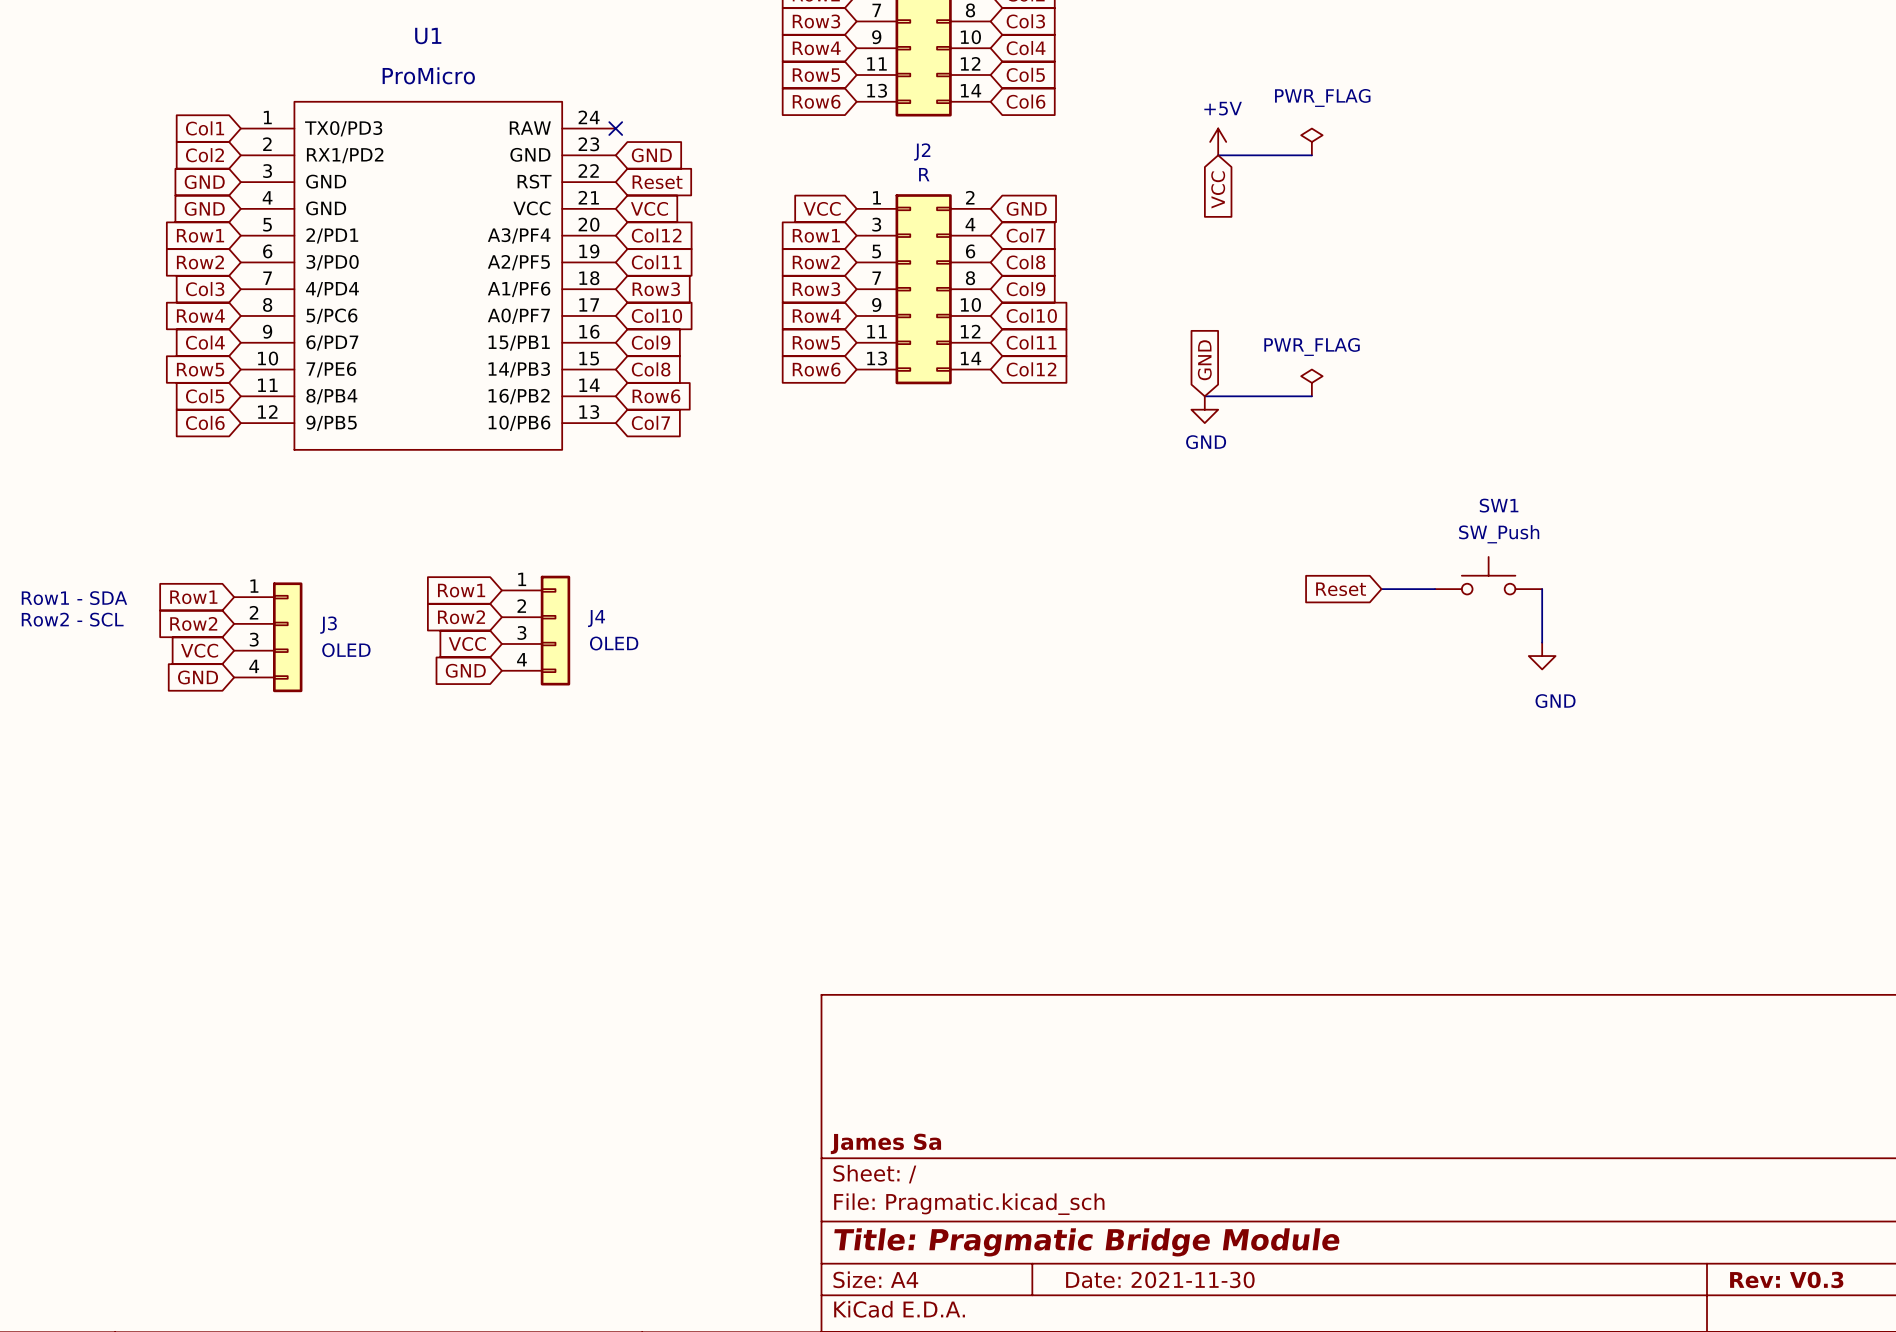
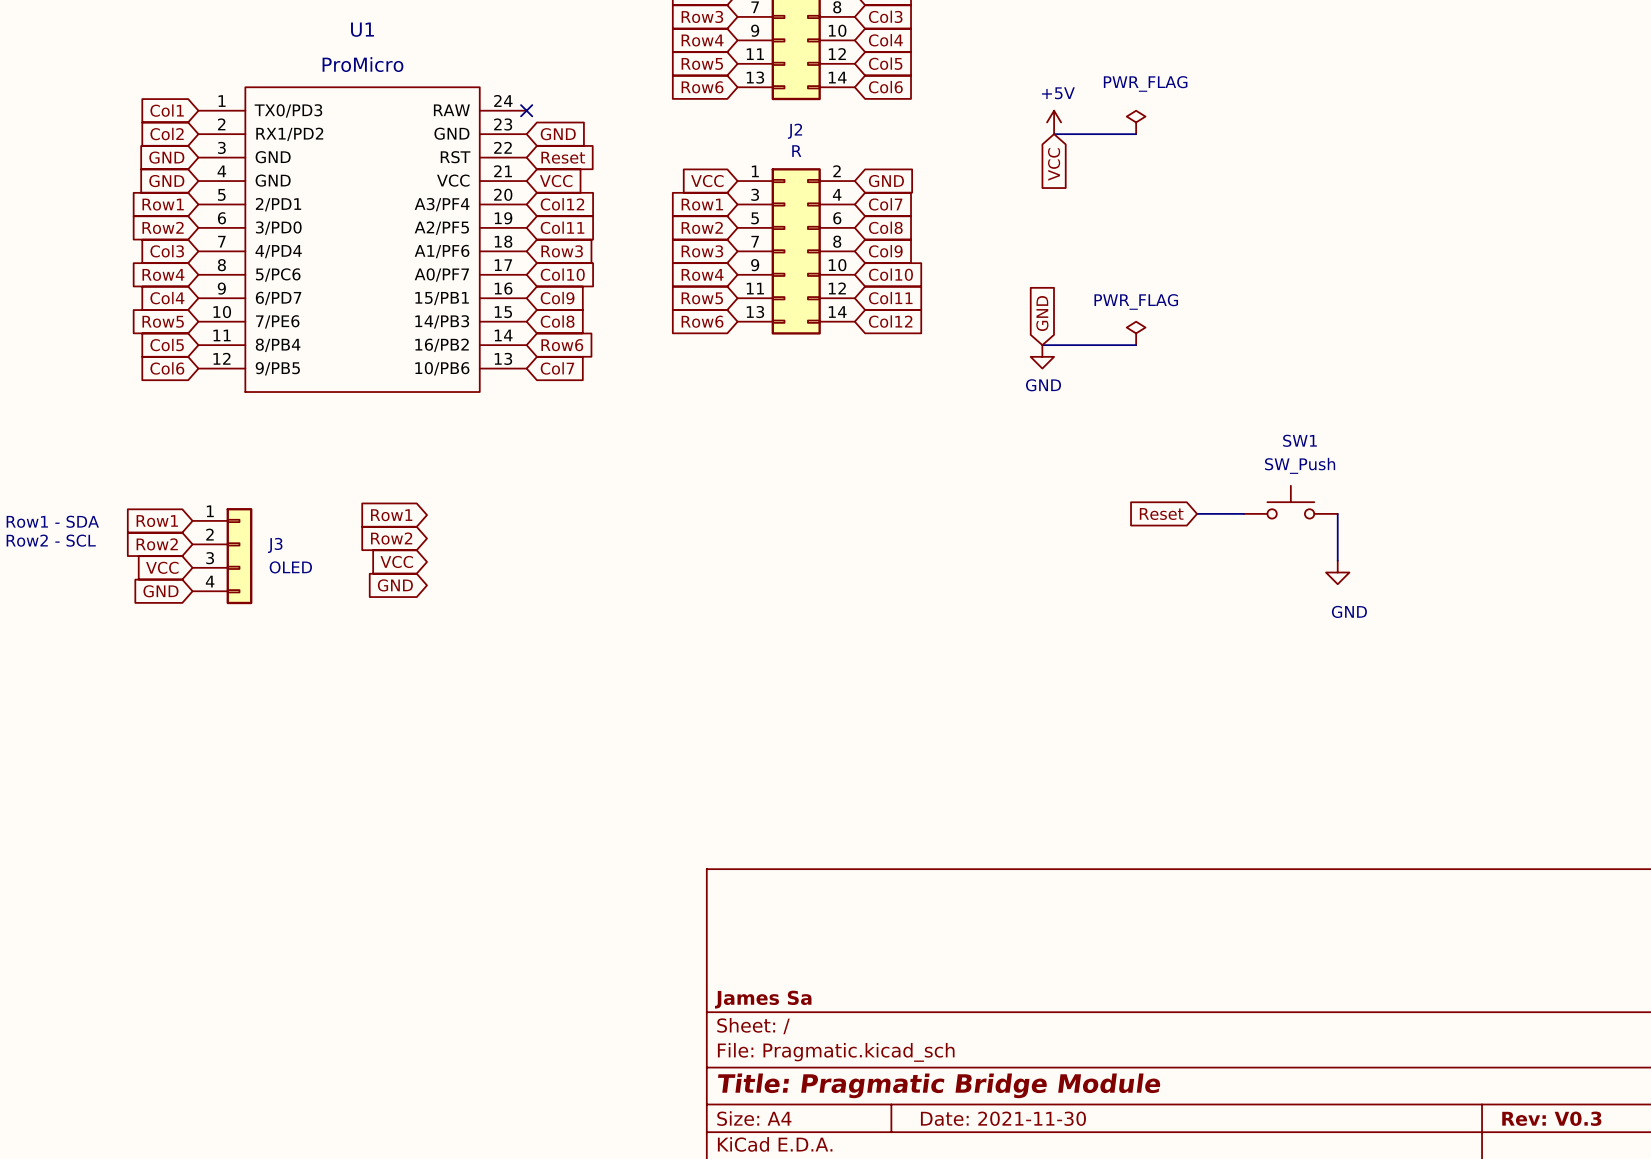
J4: OLED (536, 630) -> none

